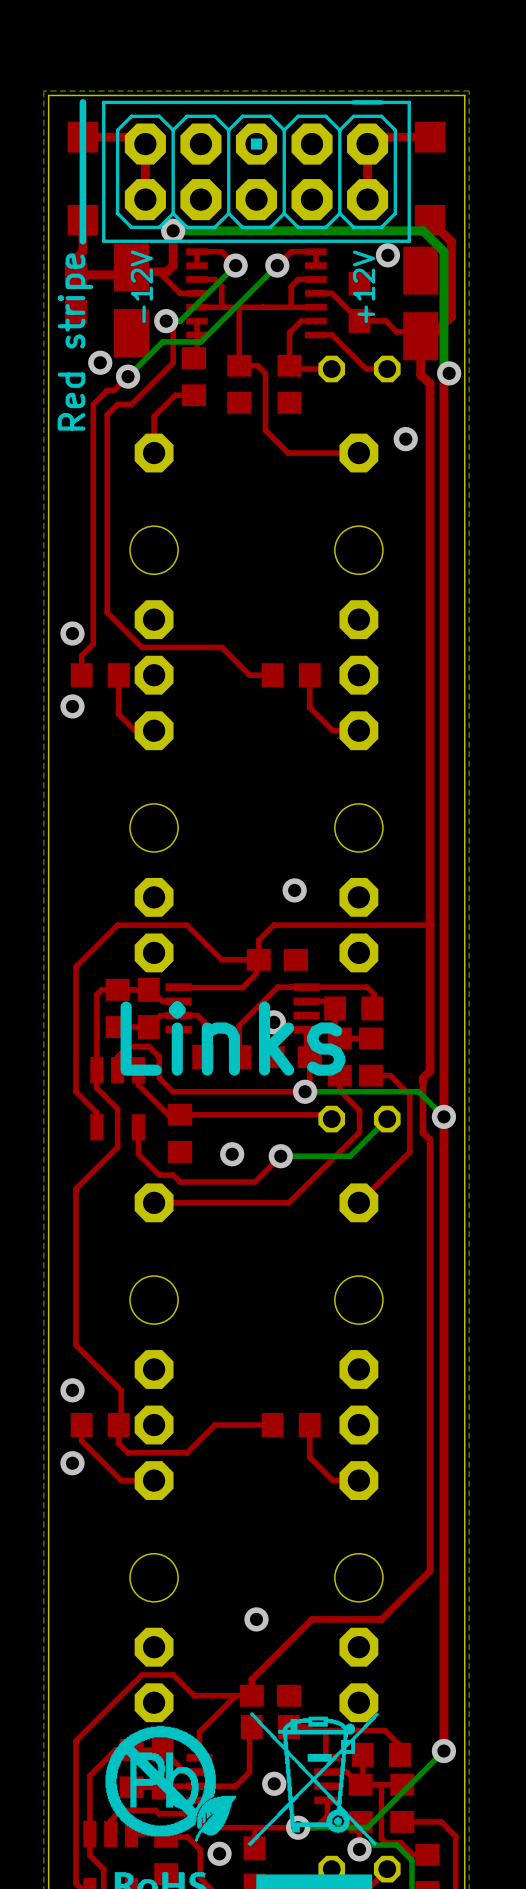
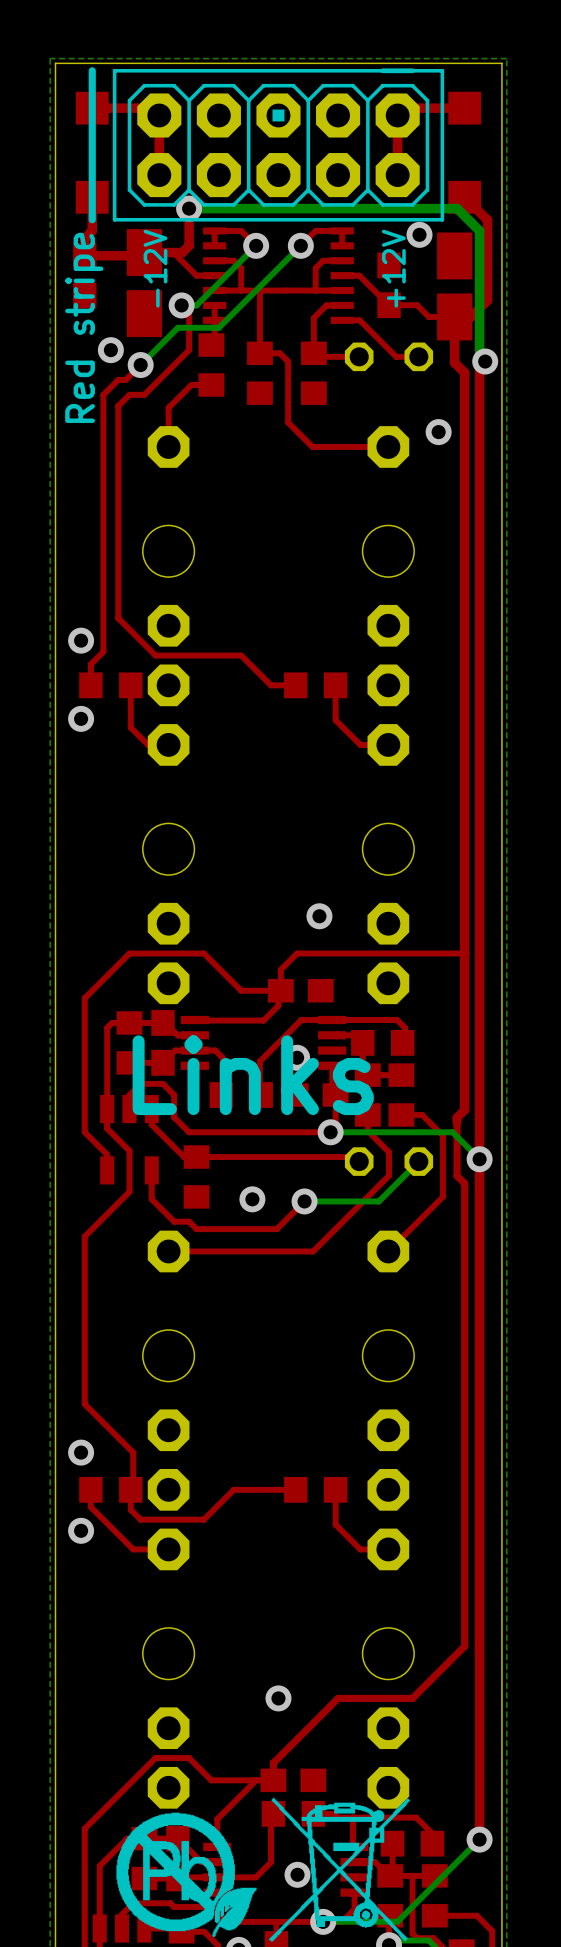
part footprint: [114, 243, 150, 358] -> [126, 229, 163, 338]
part footprint: [403, 246, 439, 361] -> [437, 232, 473, 341]

